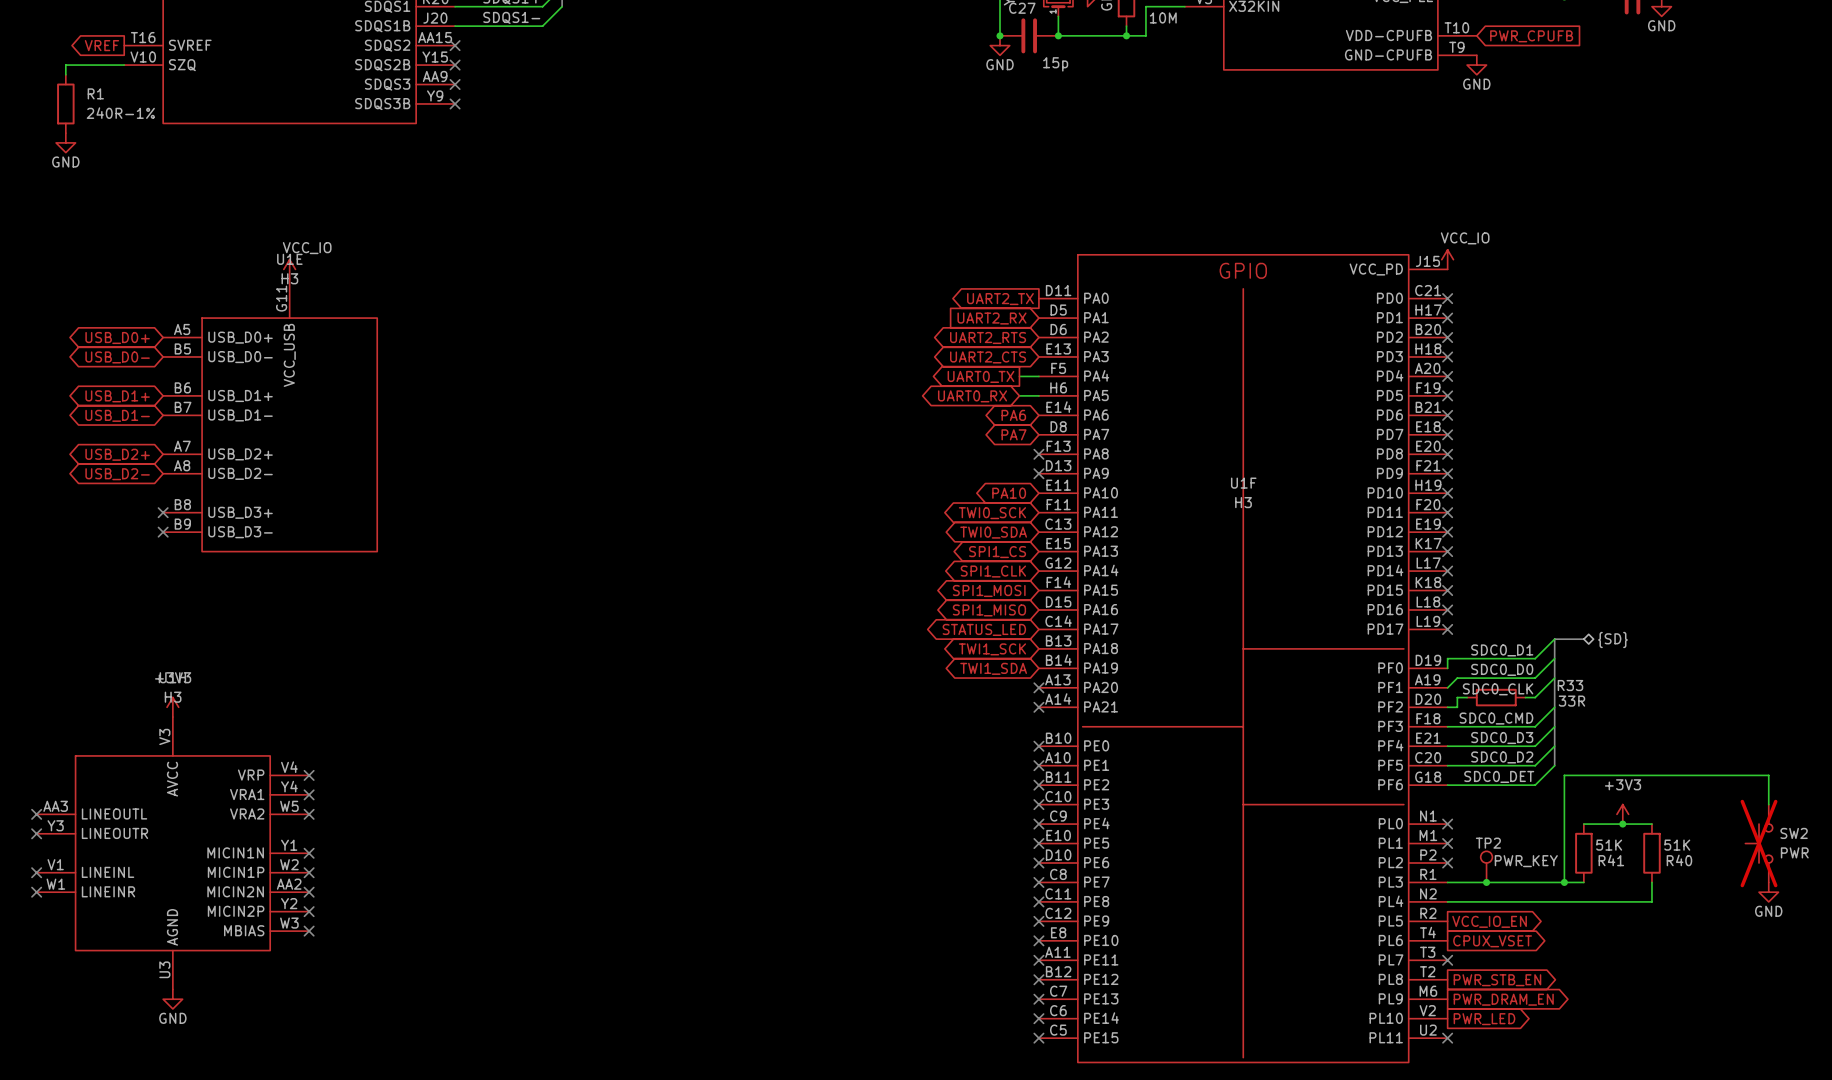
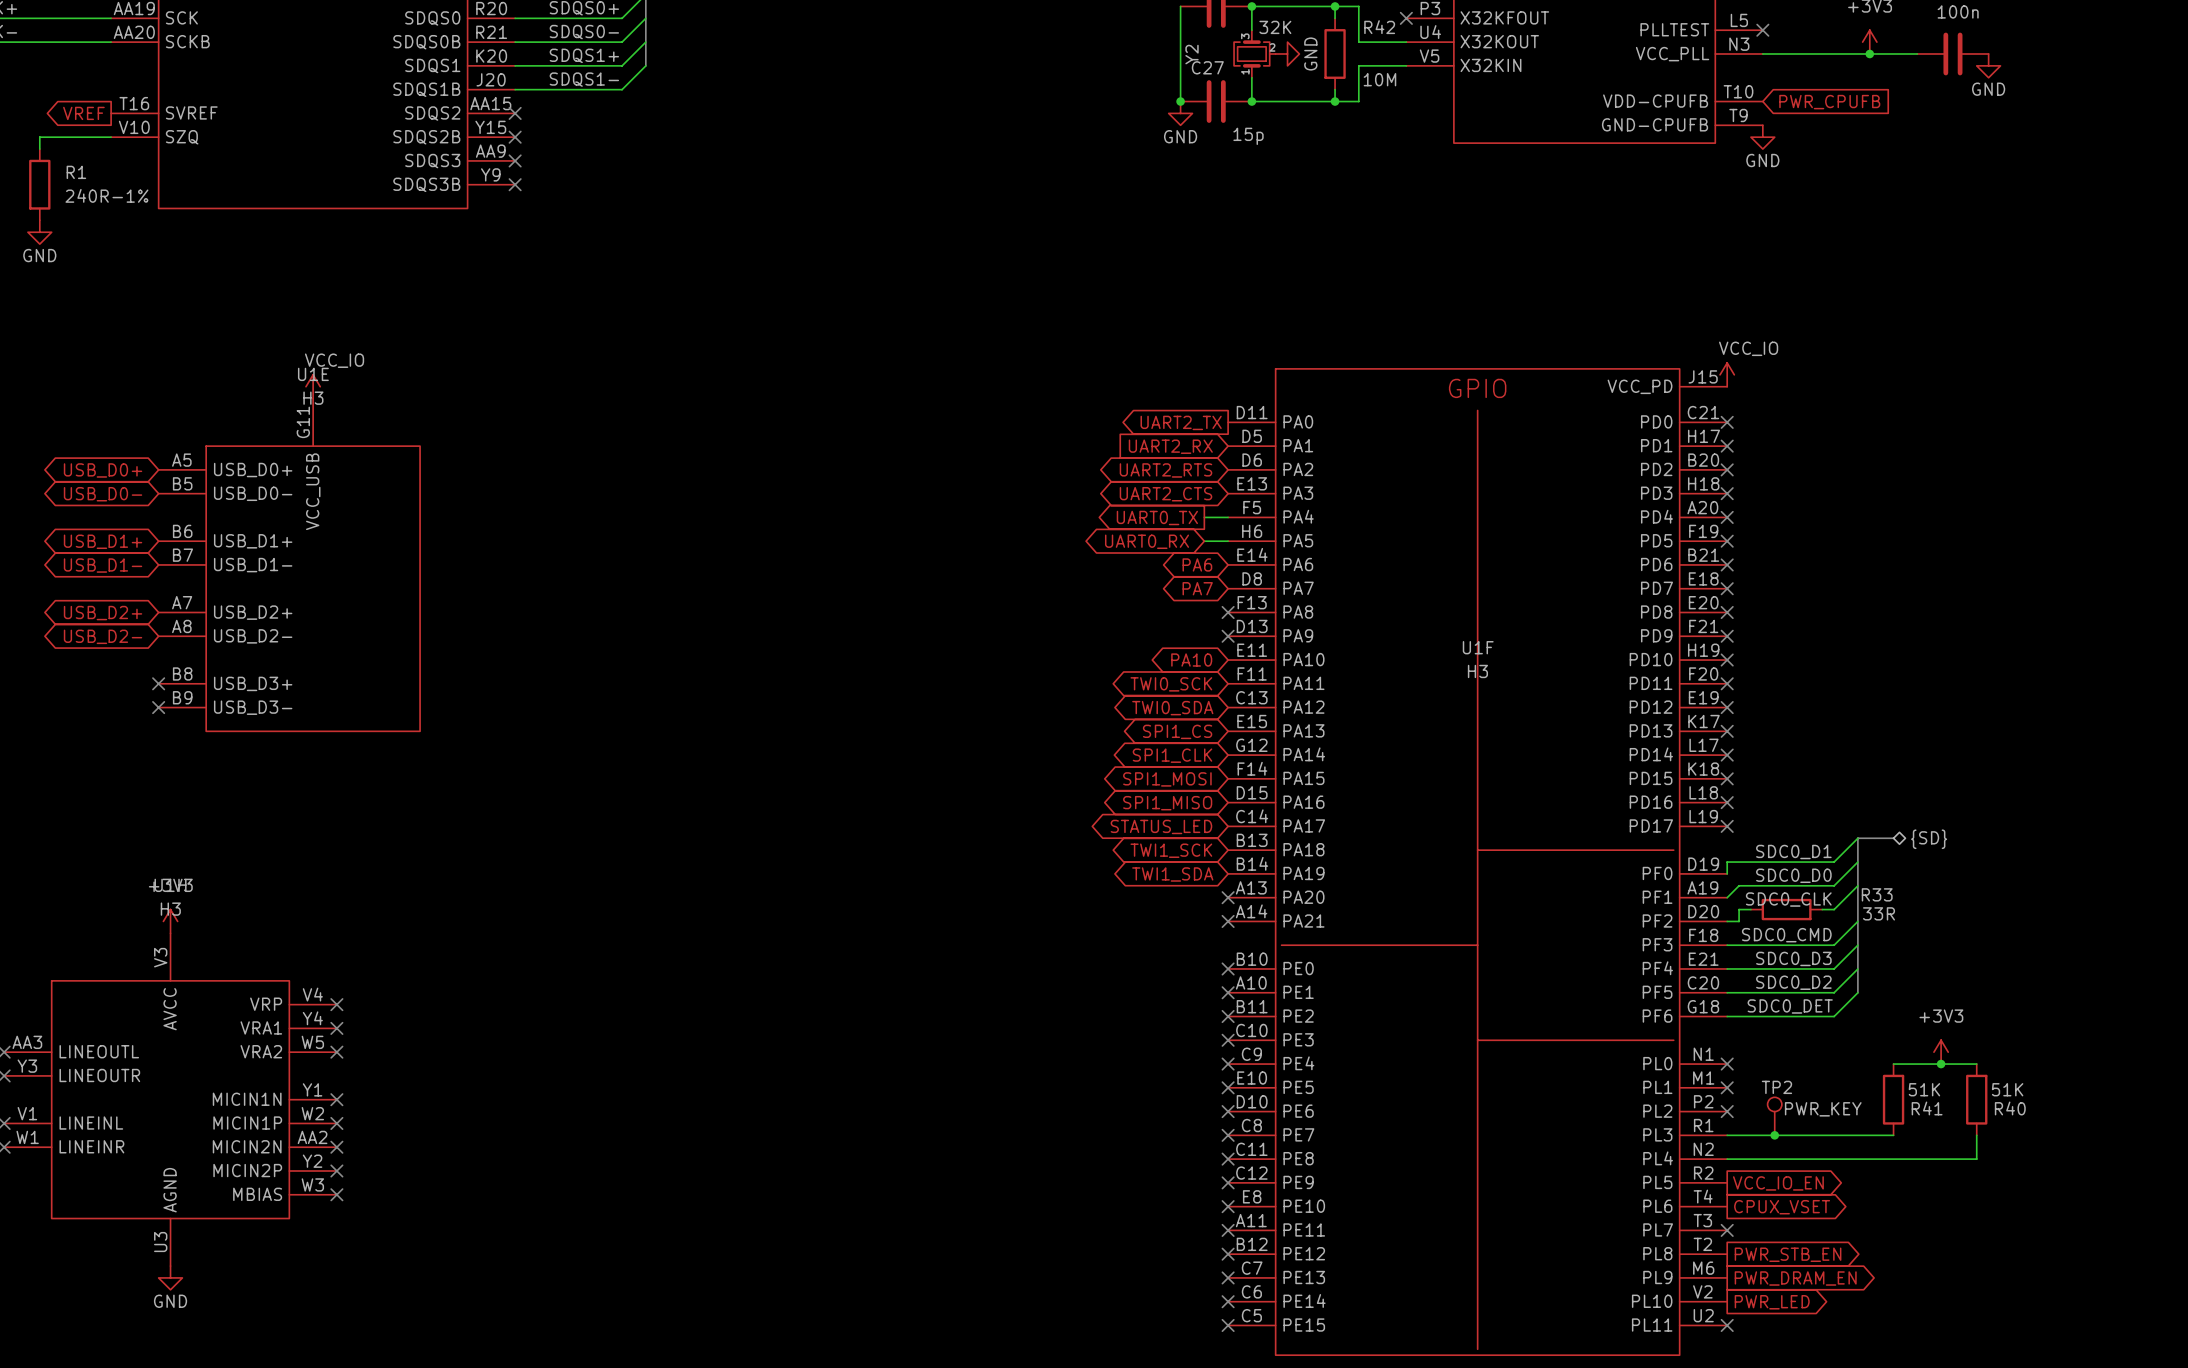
wire: (1768, 804) (1768, 775) (1564, 775) (1564, 882) -> none
SW2: PWR (1759, 843) -> none
junction: (1564, 882) -> none
power symbol: GND (1768, 892) -> none

